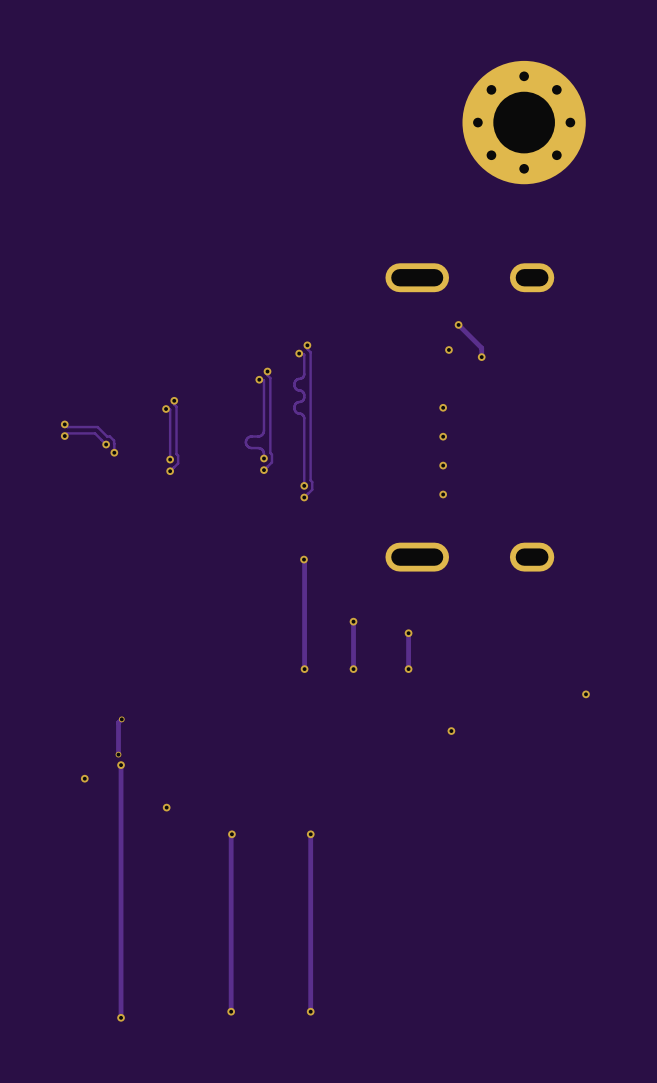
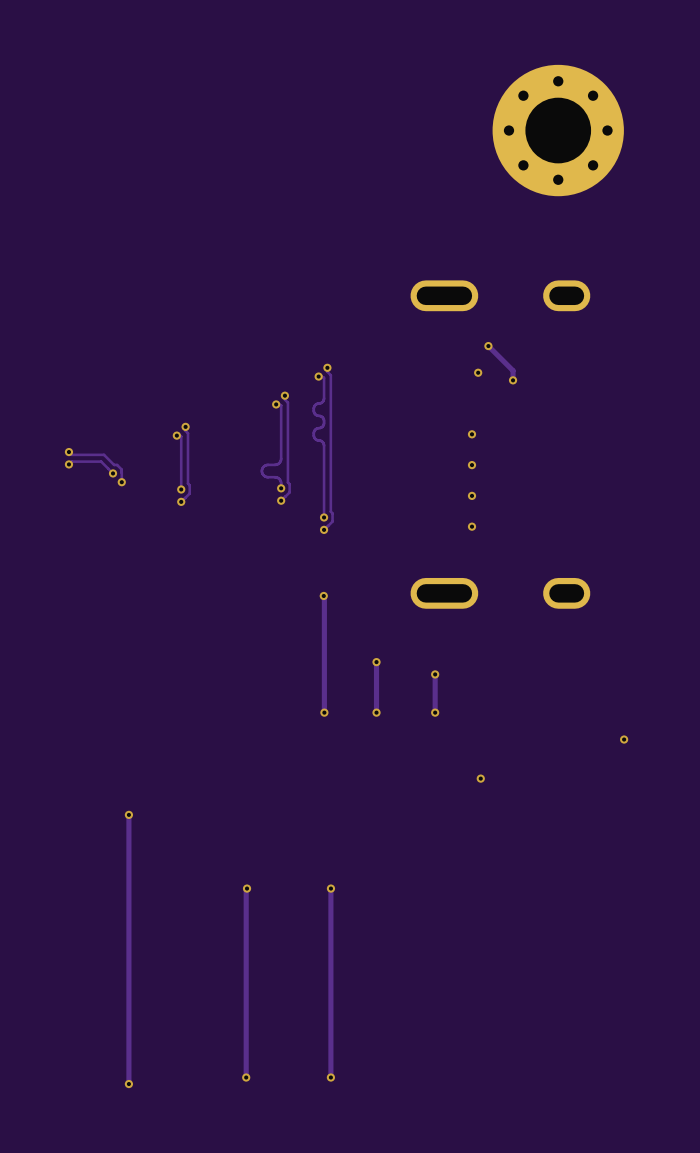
track: (121, 719) (118, 722) (118, 754) -> none
via: (121, 719) -> none
via: (118, 754) -> none
via: (84, 778) -> none
via: (166, 807) -> none

